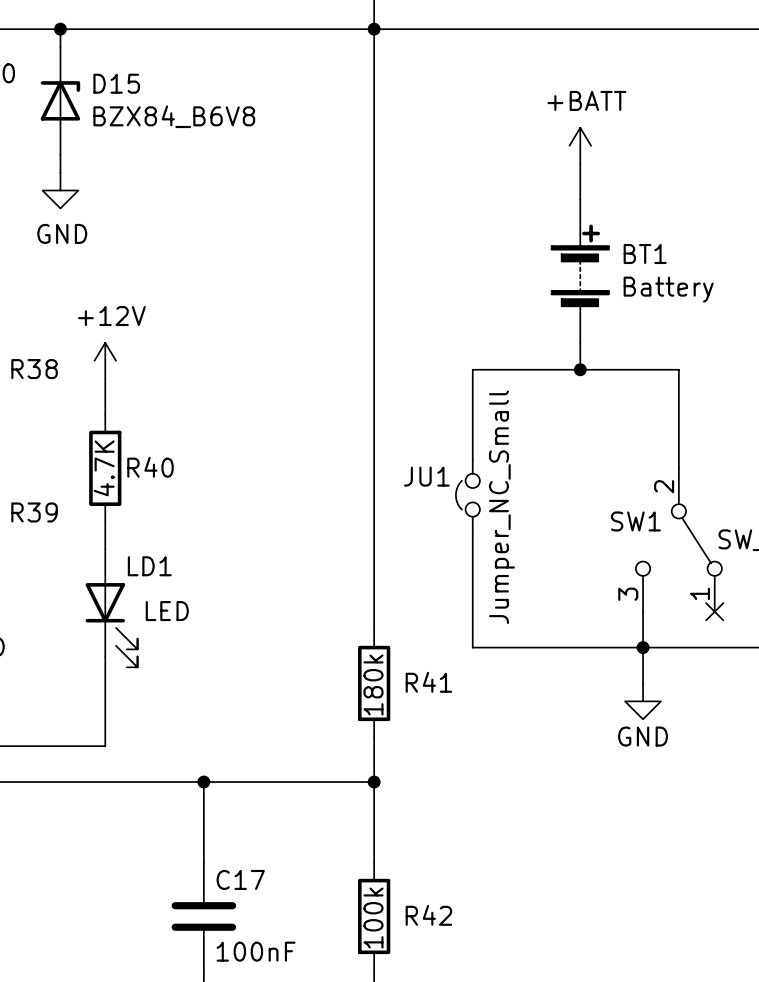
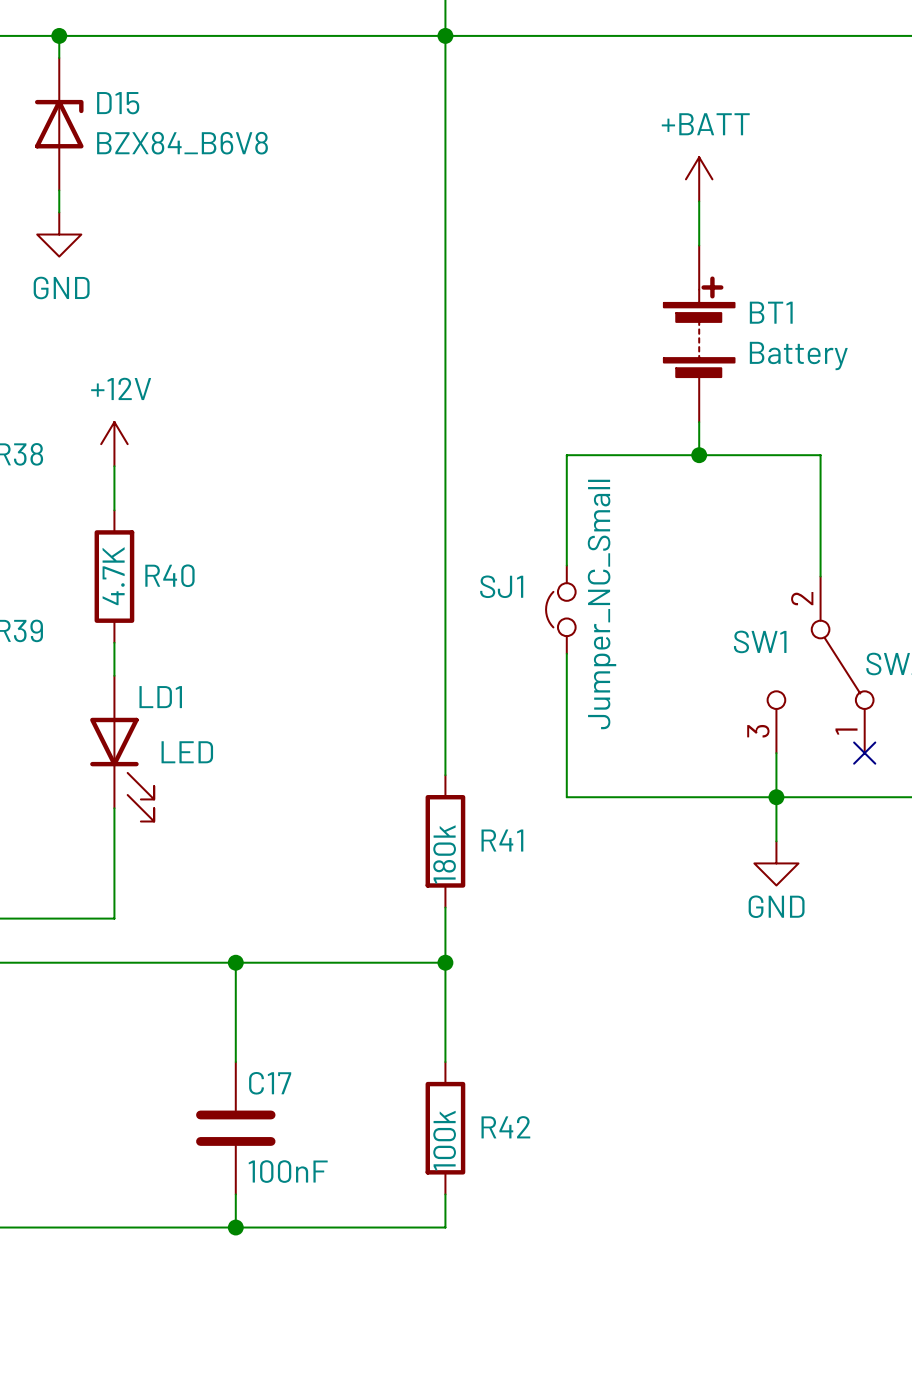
JU1 name: JU1 (426, 476) -> SJ1 (501, 586)

